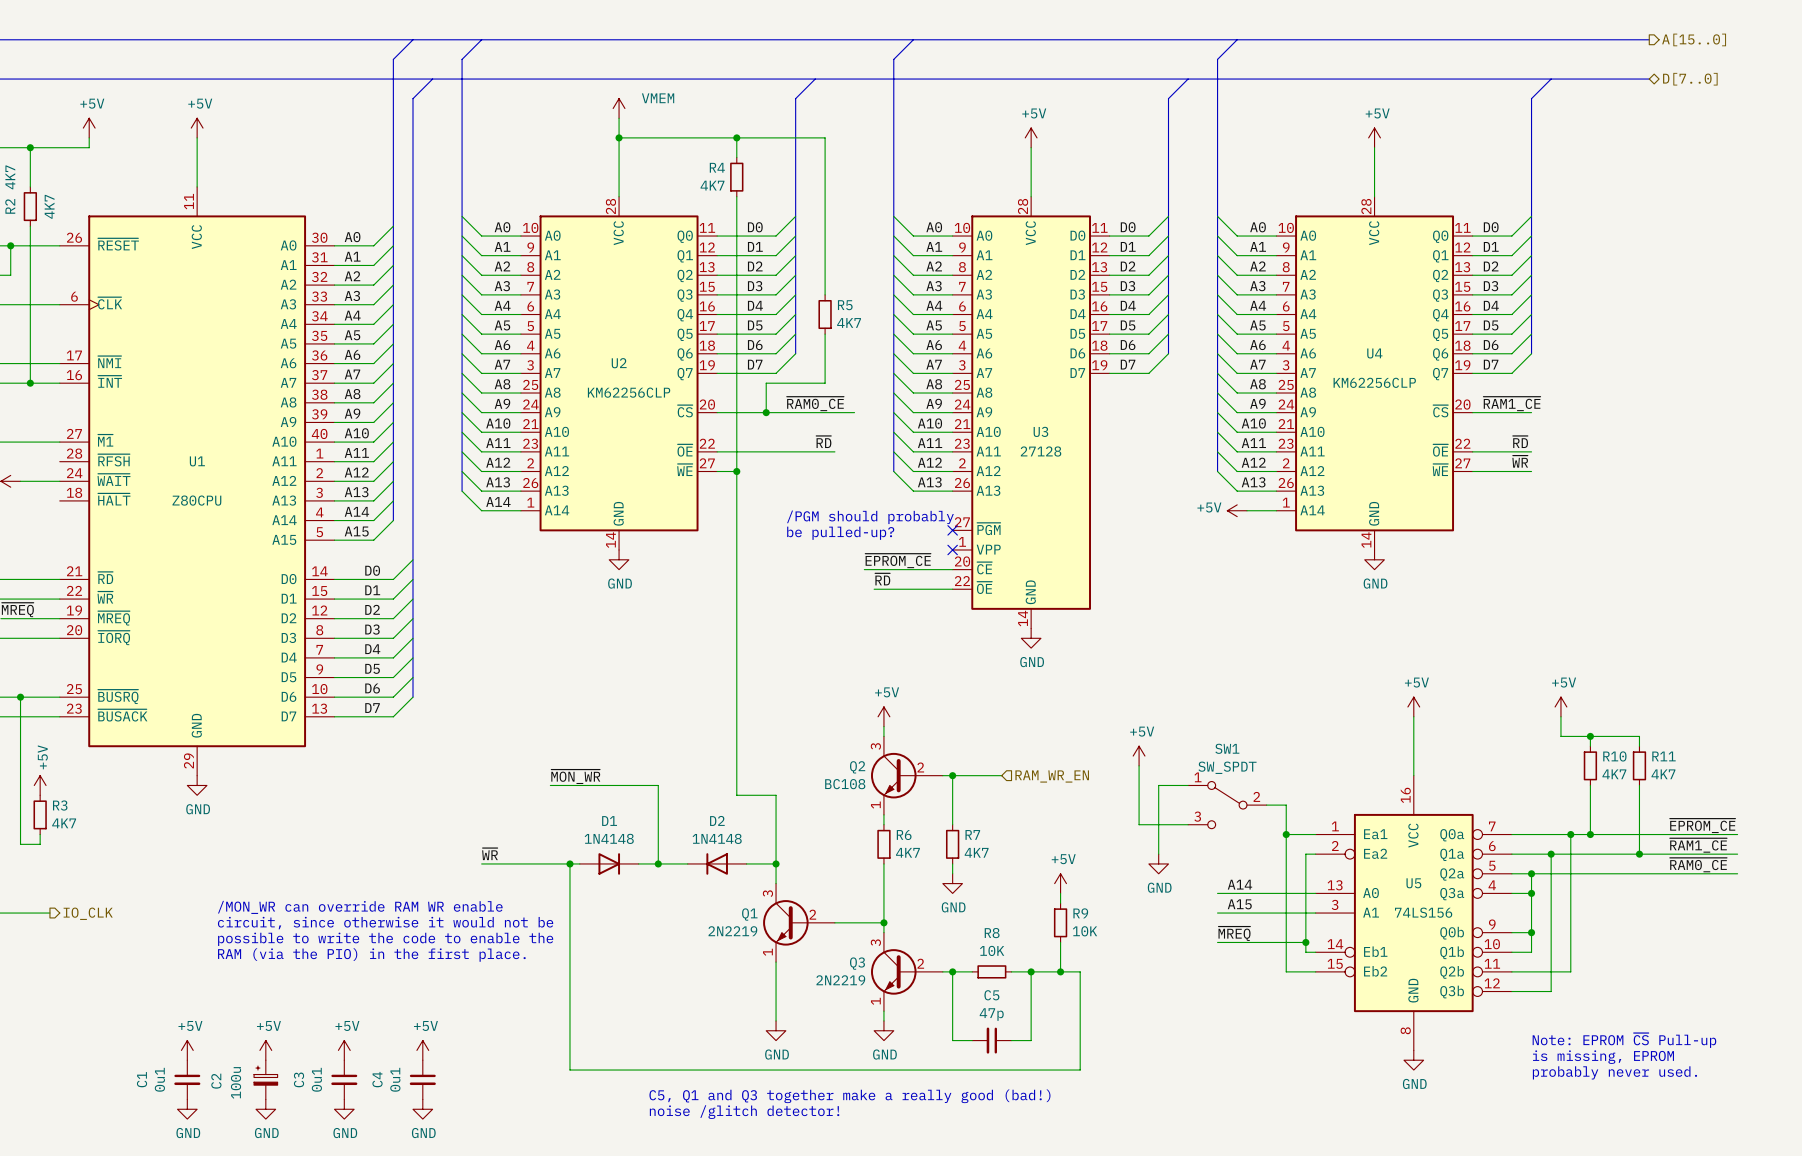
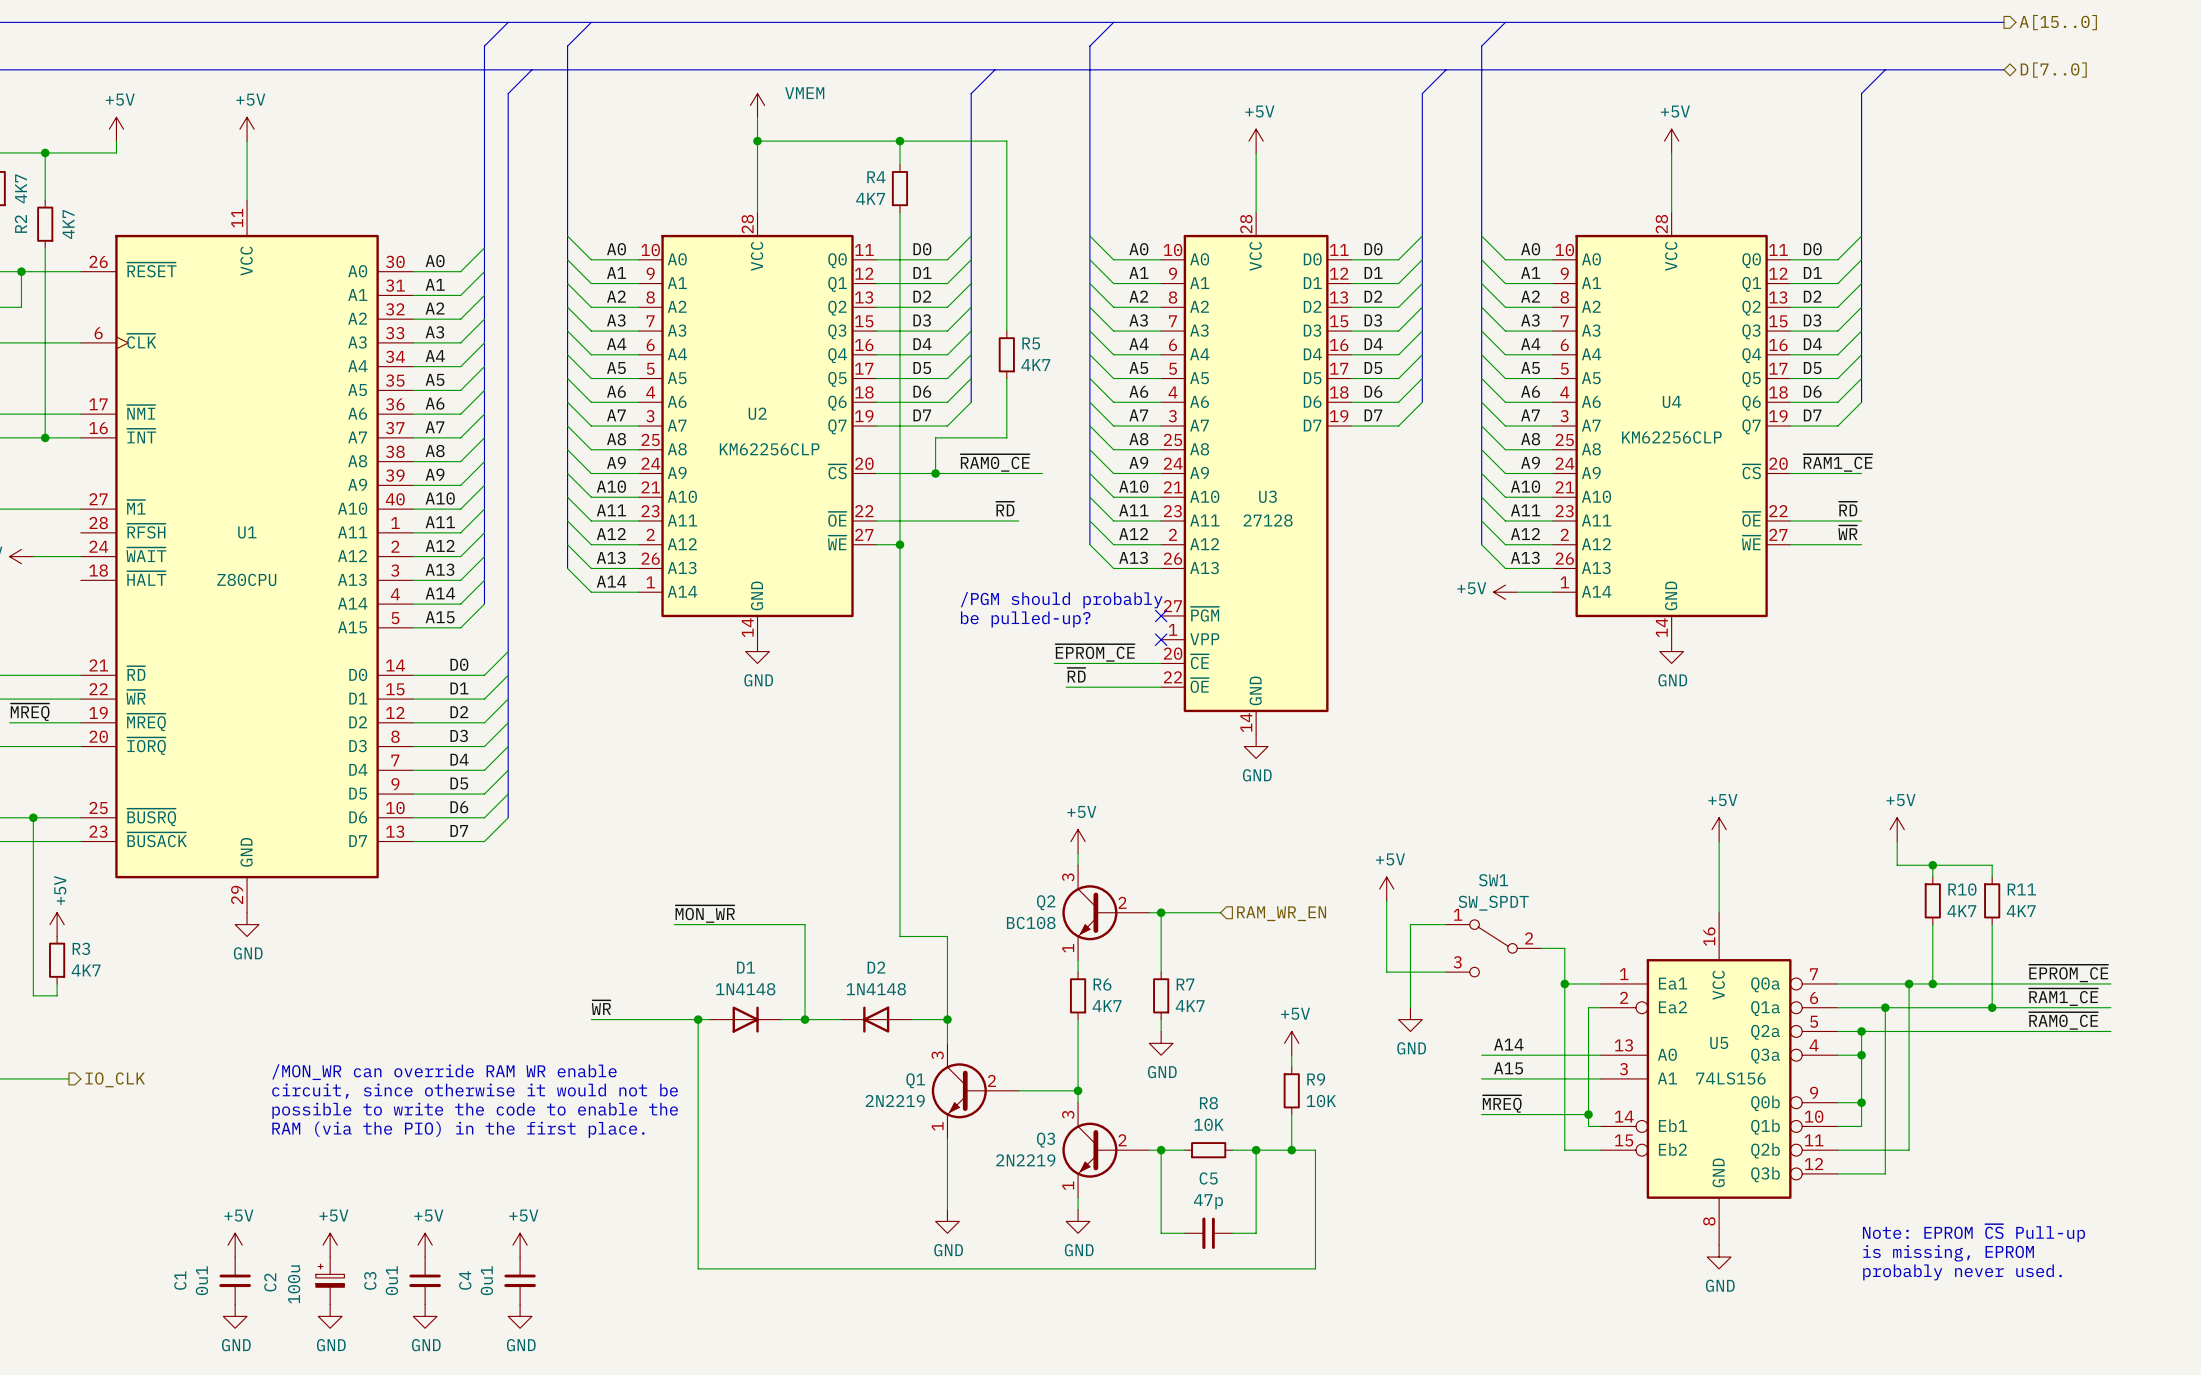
text: C5, Q1 and Q3 together make a really good (bad!) (849, 1096) -> none
text: noise /glitch detector! (744, 1112) -> none

